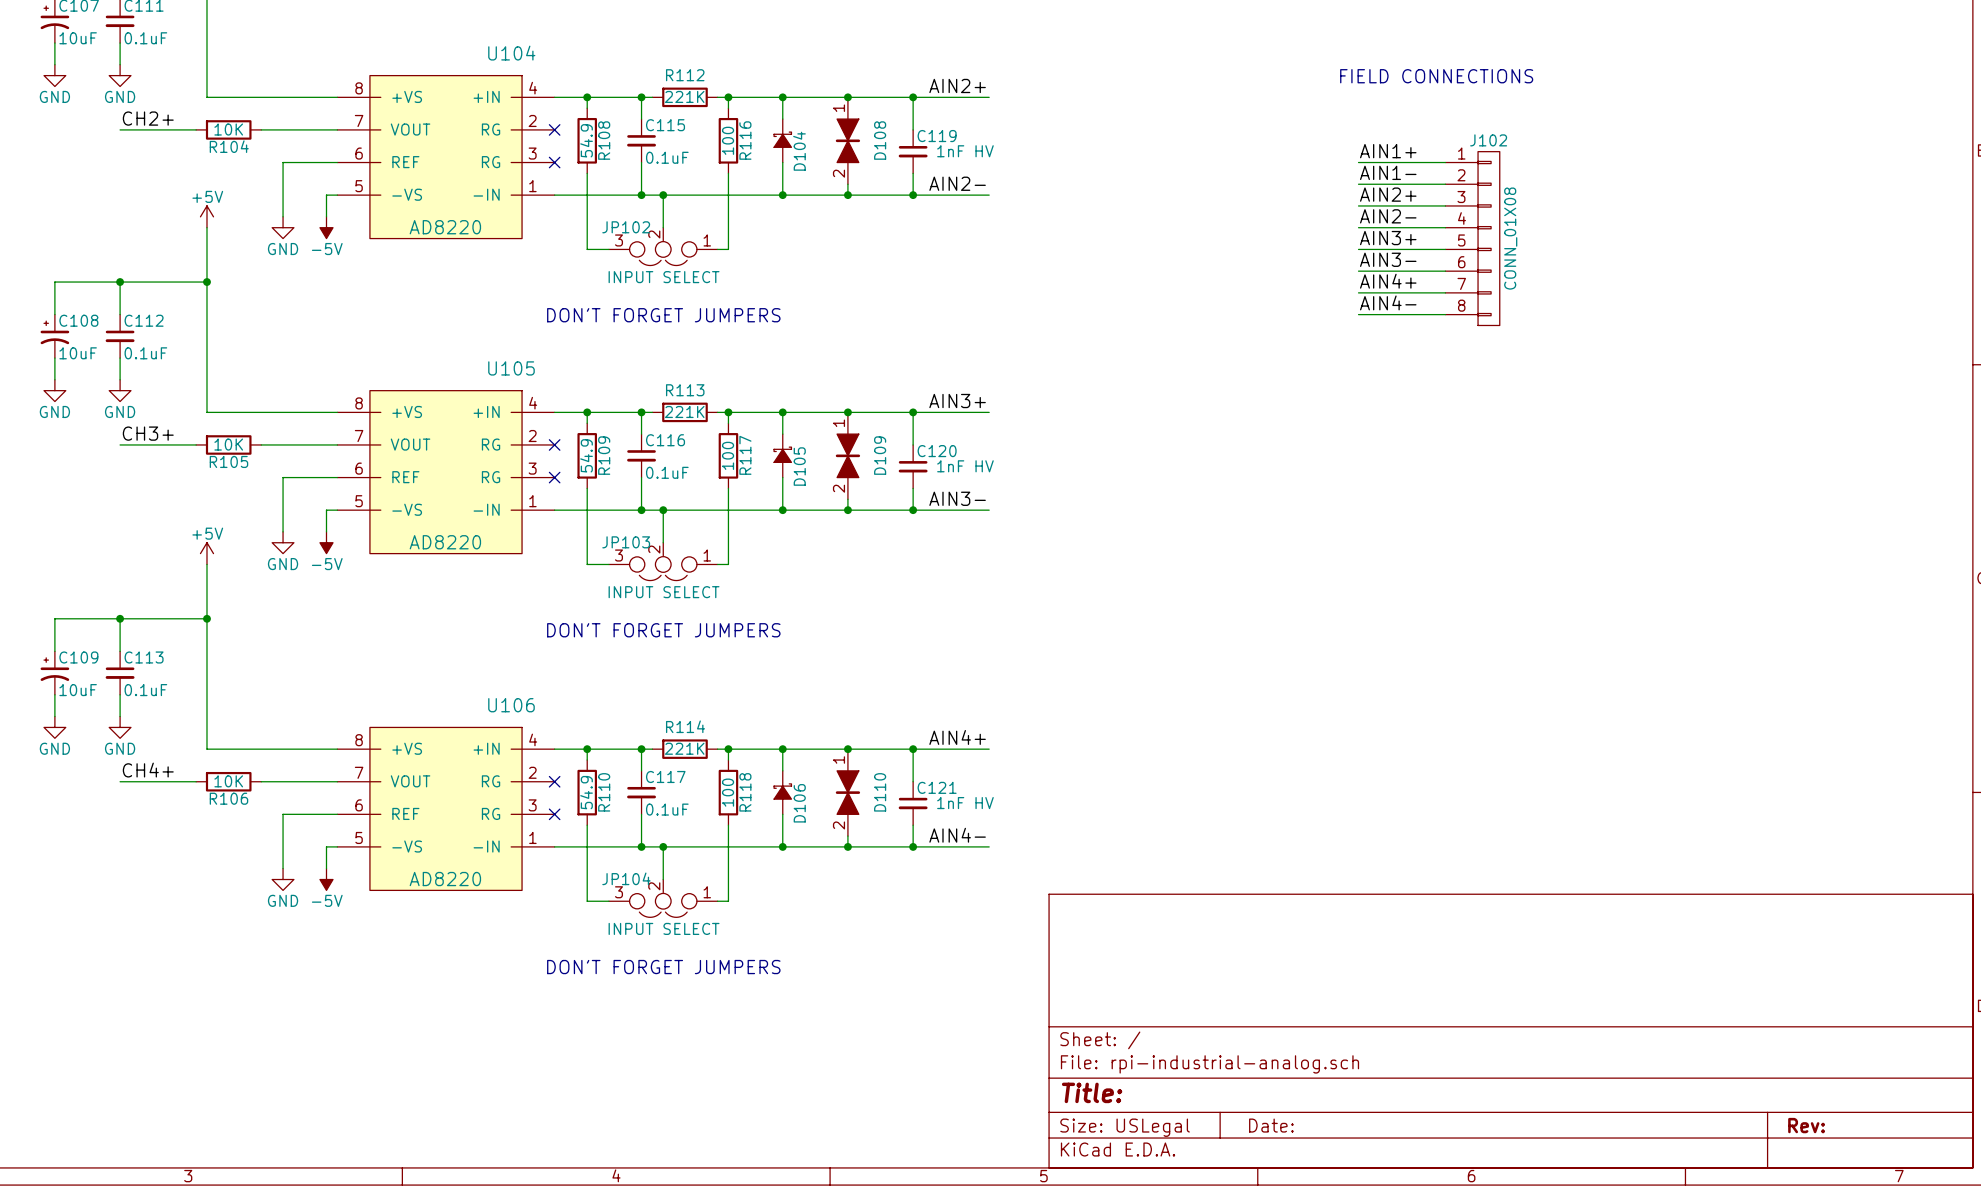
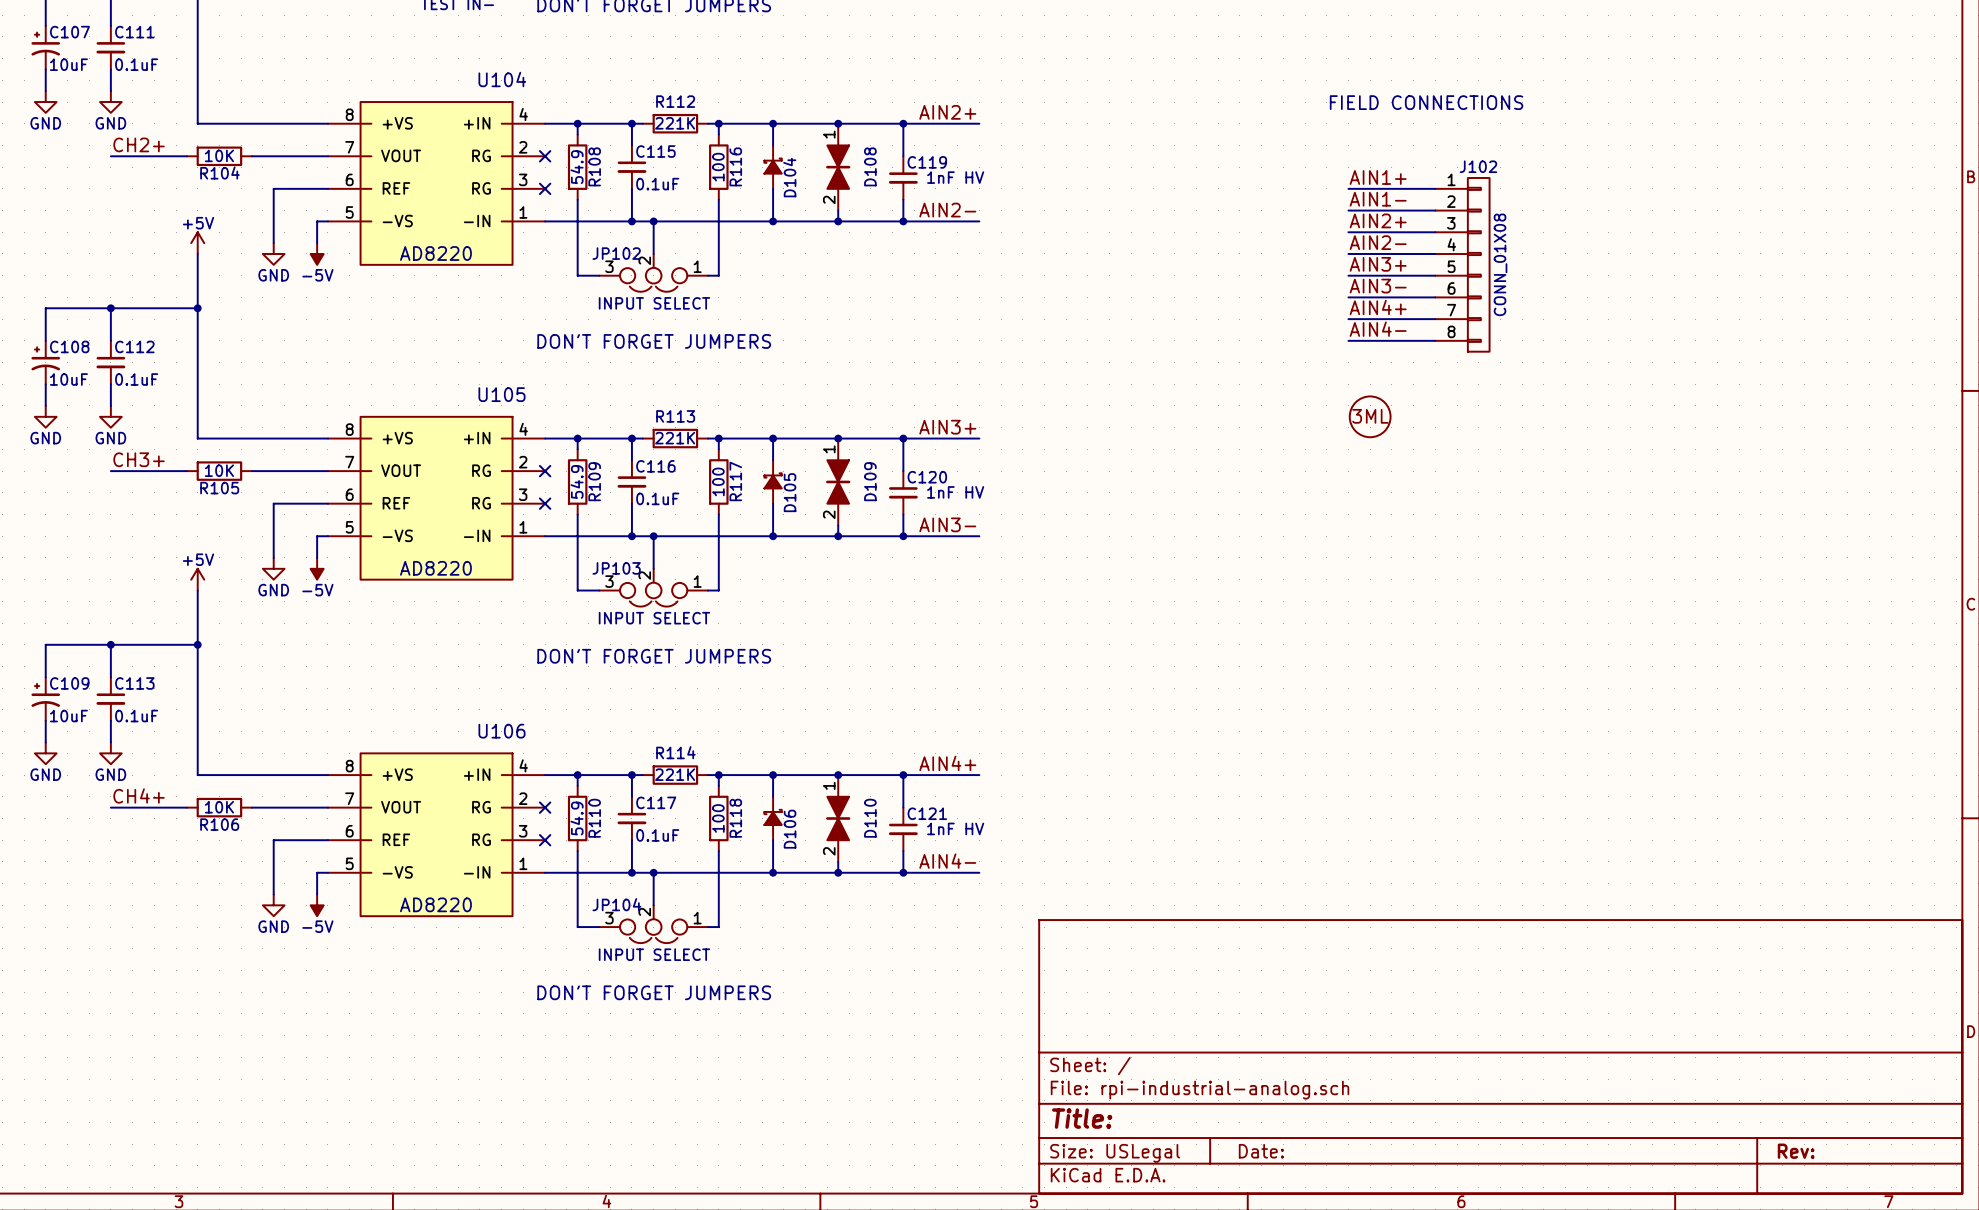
part: none -> (1370, 416)

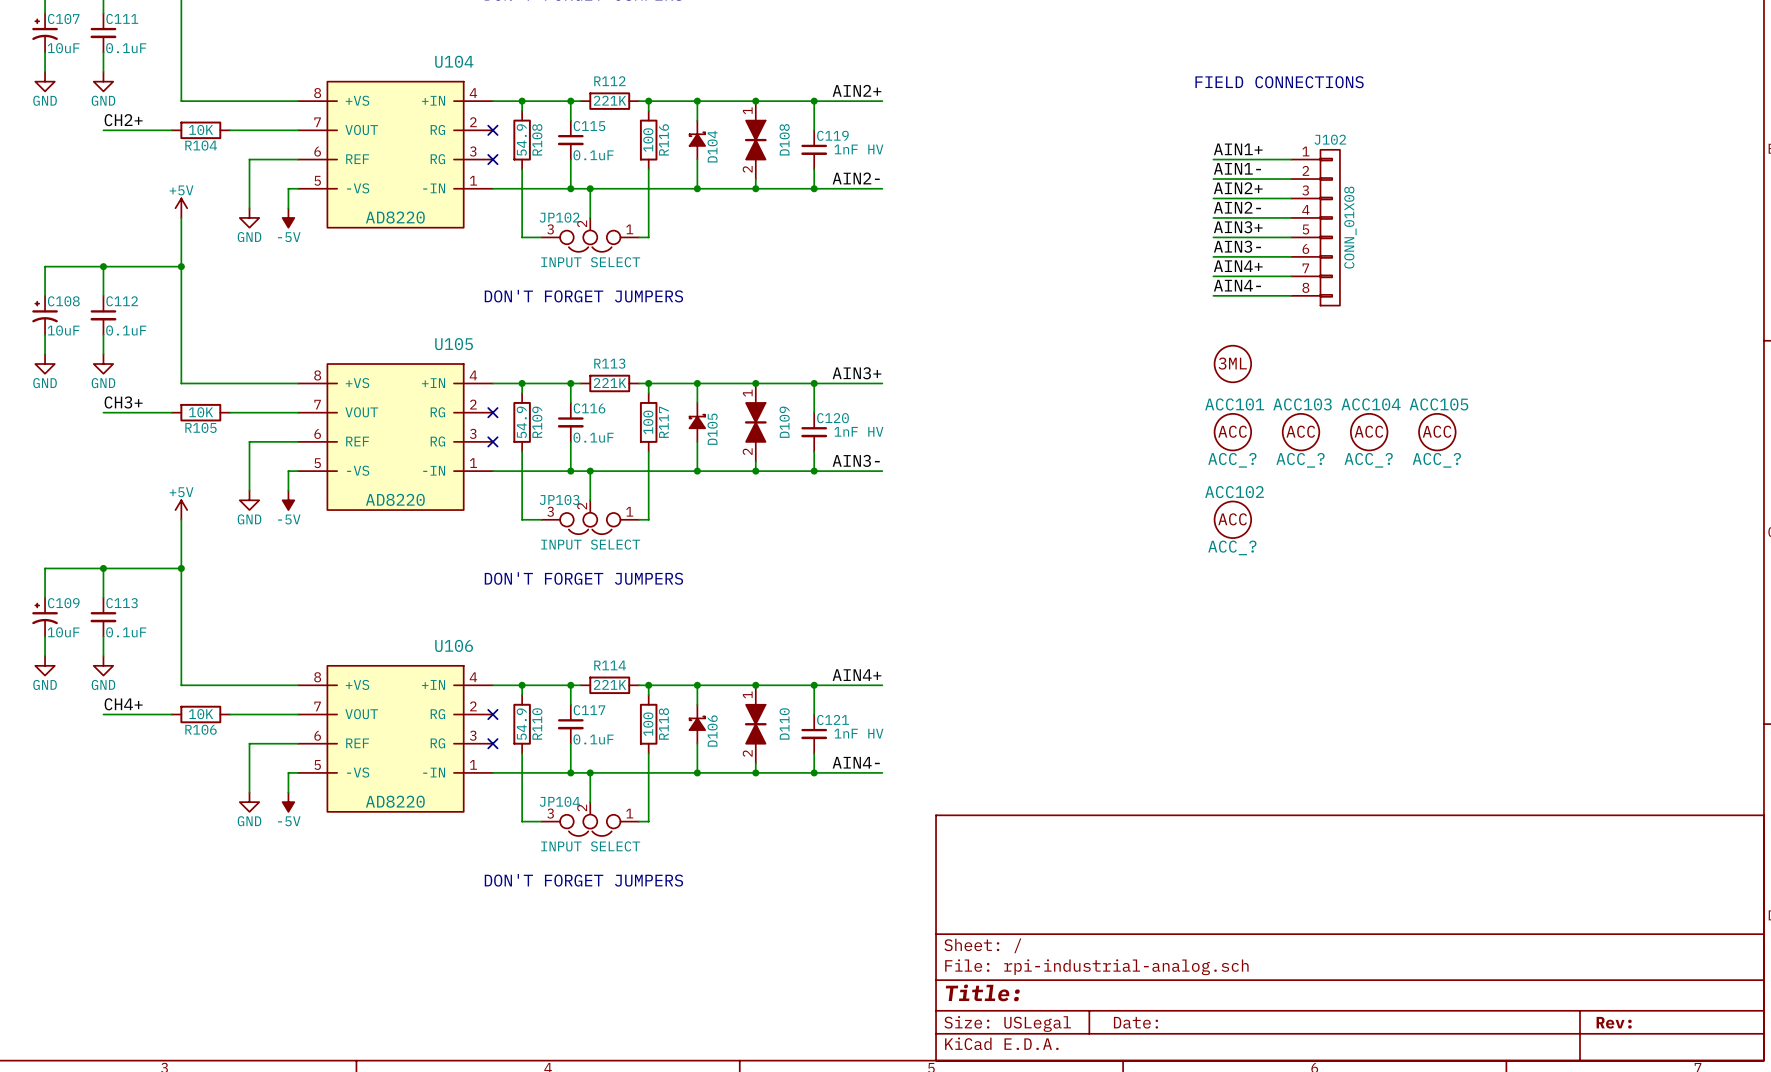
ACC101: none -> ACC_? (1232, 432)
ACC103: none -> ACC_? (1301, 432)
ACC104: none -> ACC_? (1369, 432)
ACC105: none -> ACC_? (1437, 432)
ACC102: none -> ACC_? (1232, 519)

